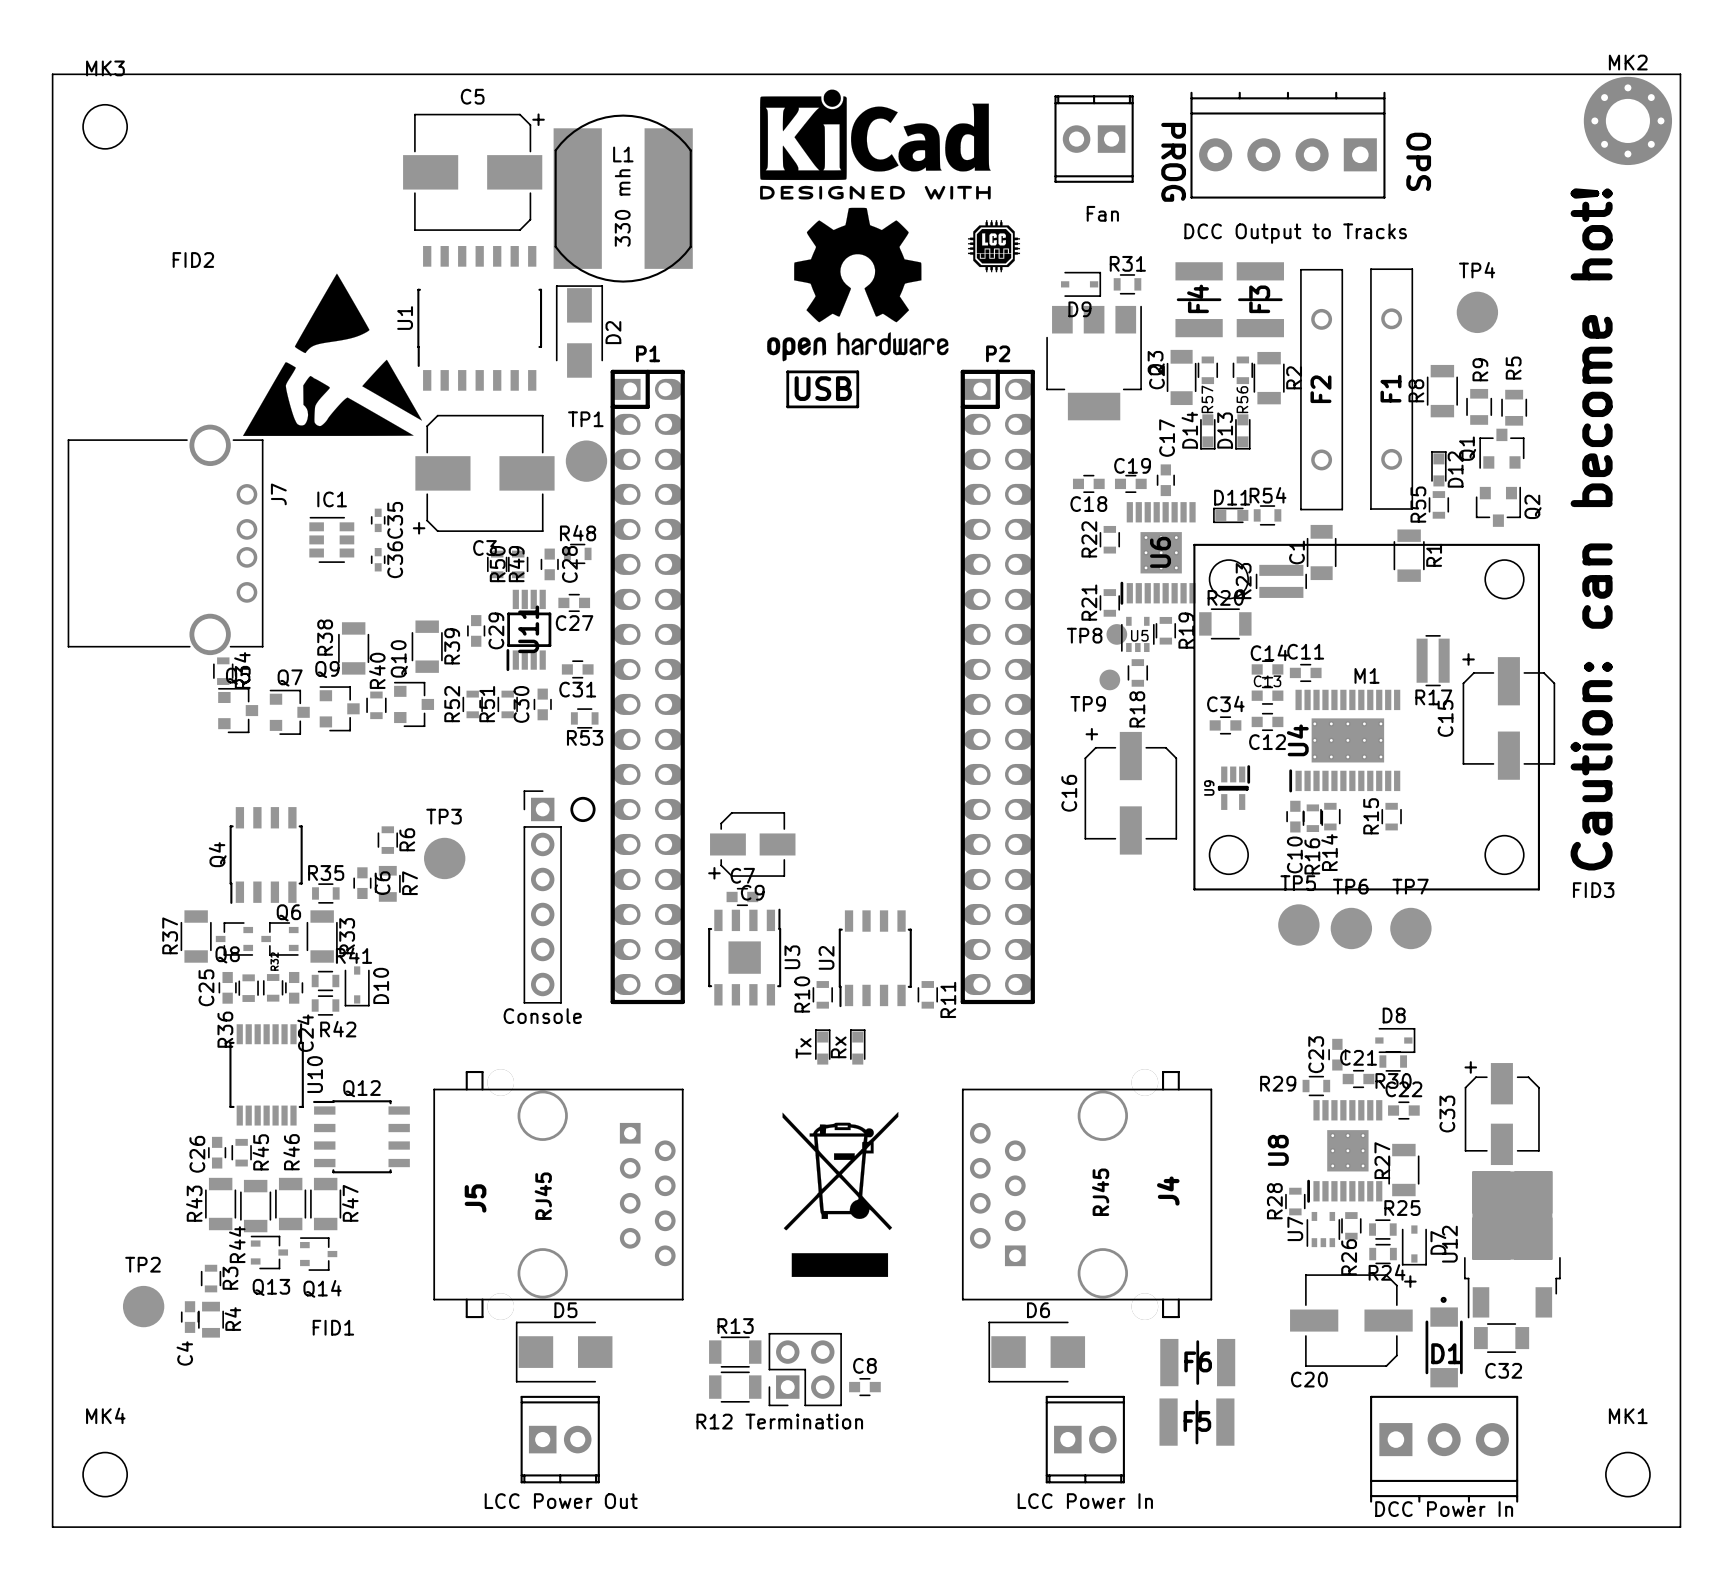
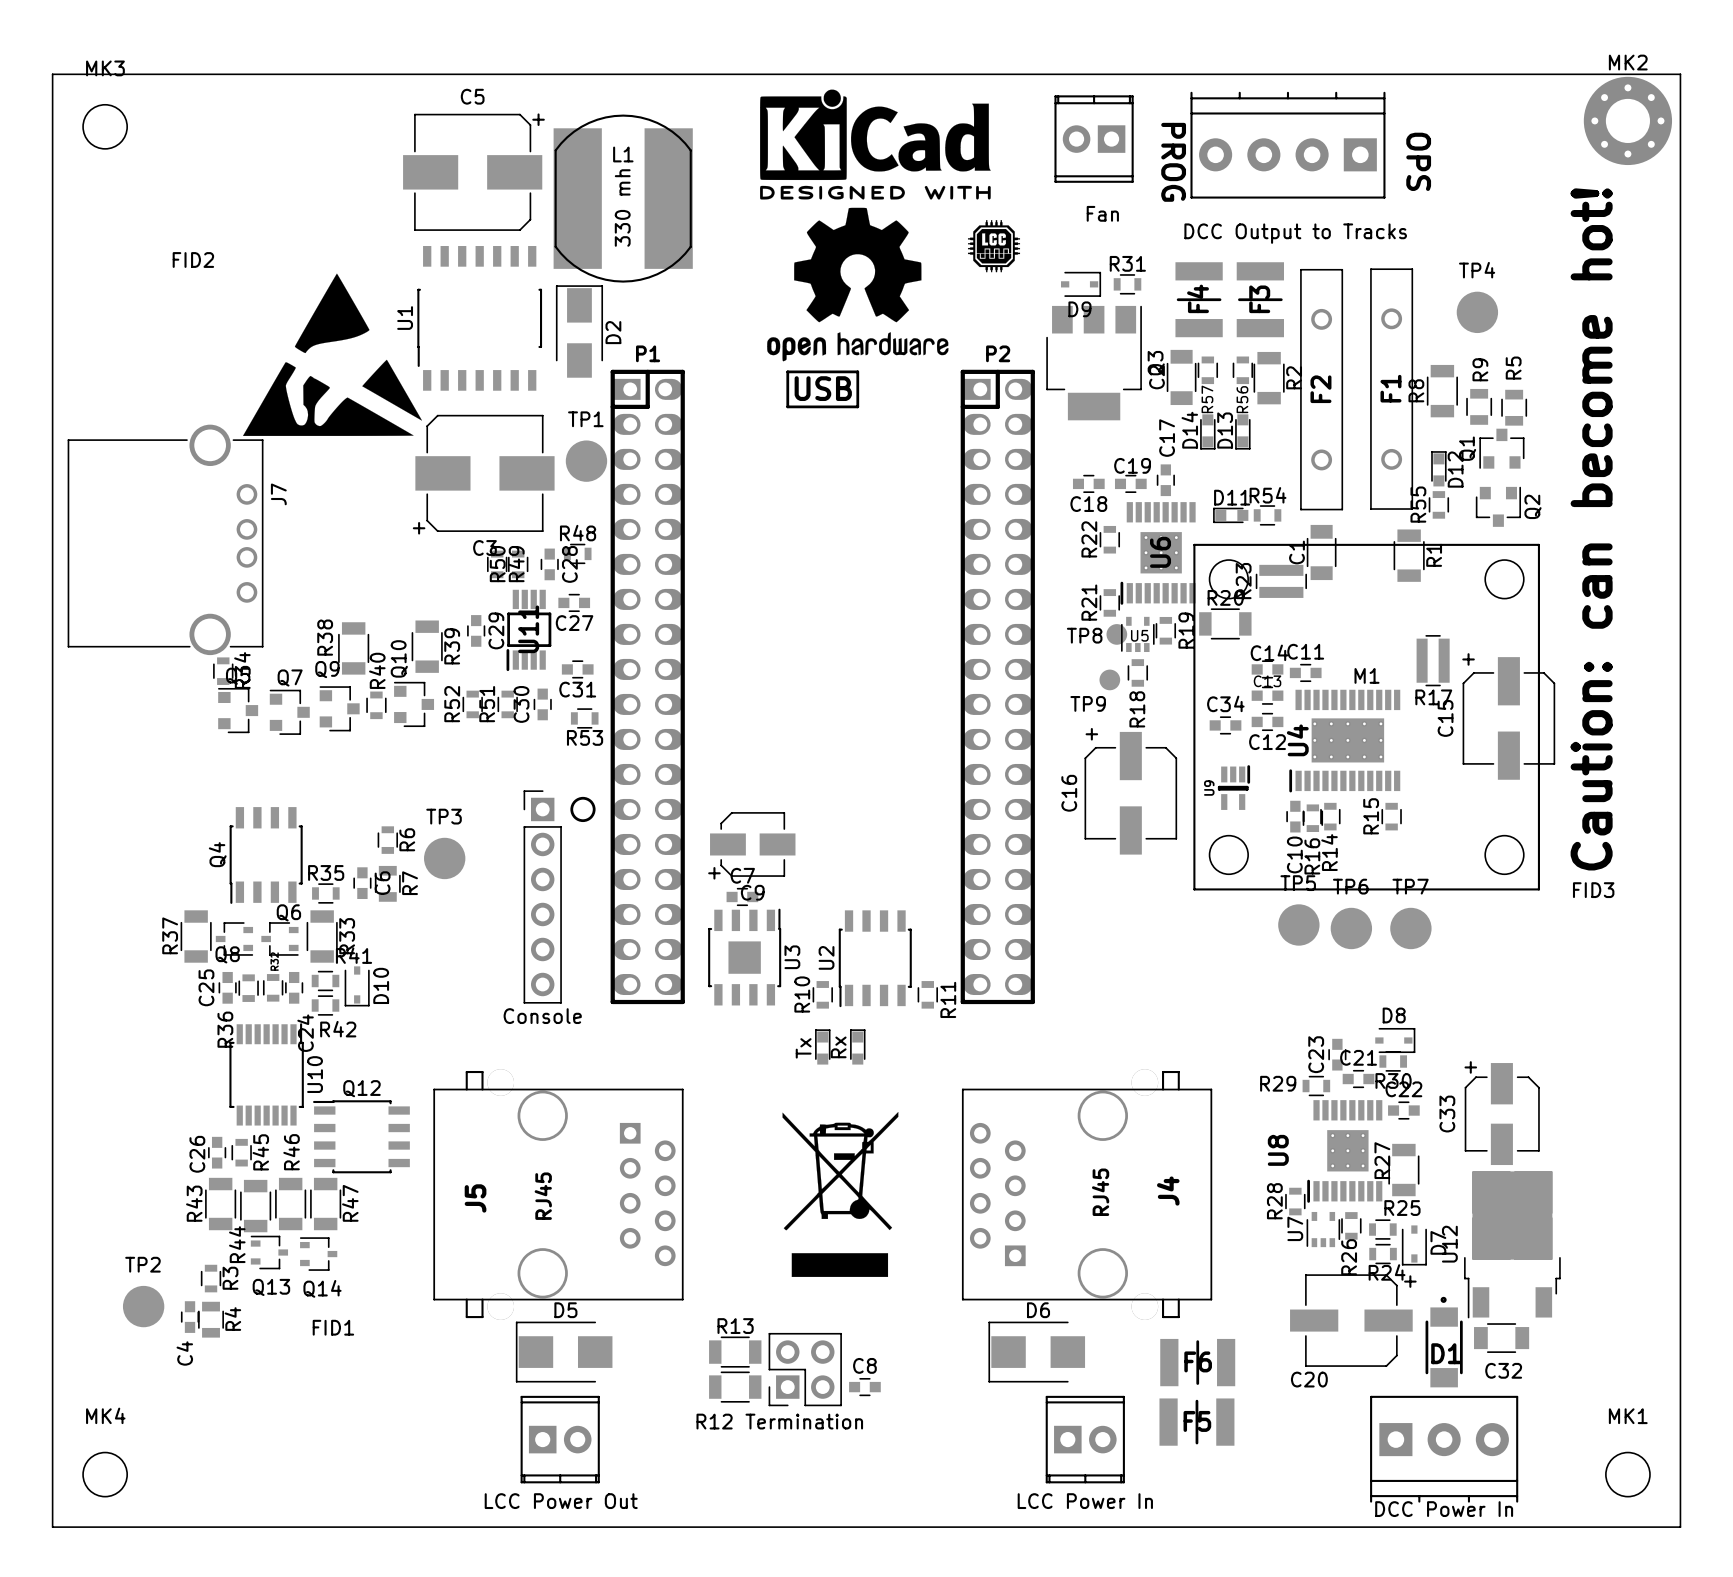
C35: (378, 520) -> none
IC1: (331, 539) -> none
C36: (378, 559) -> none

